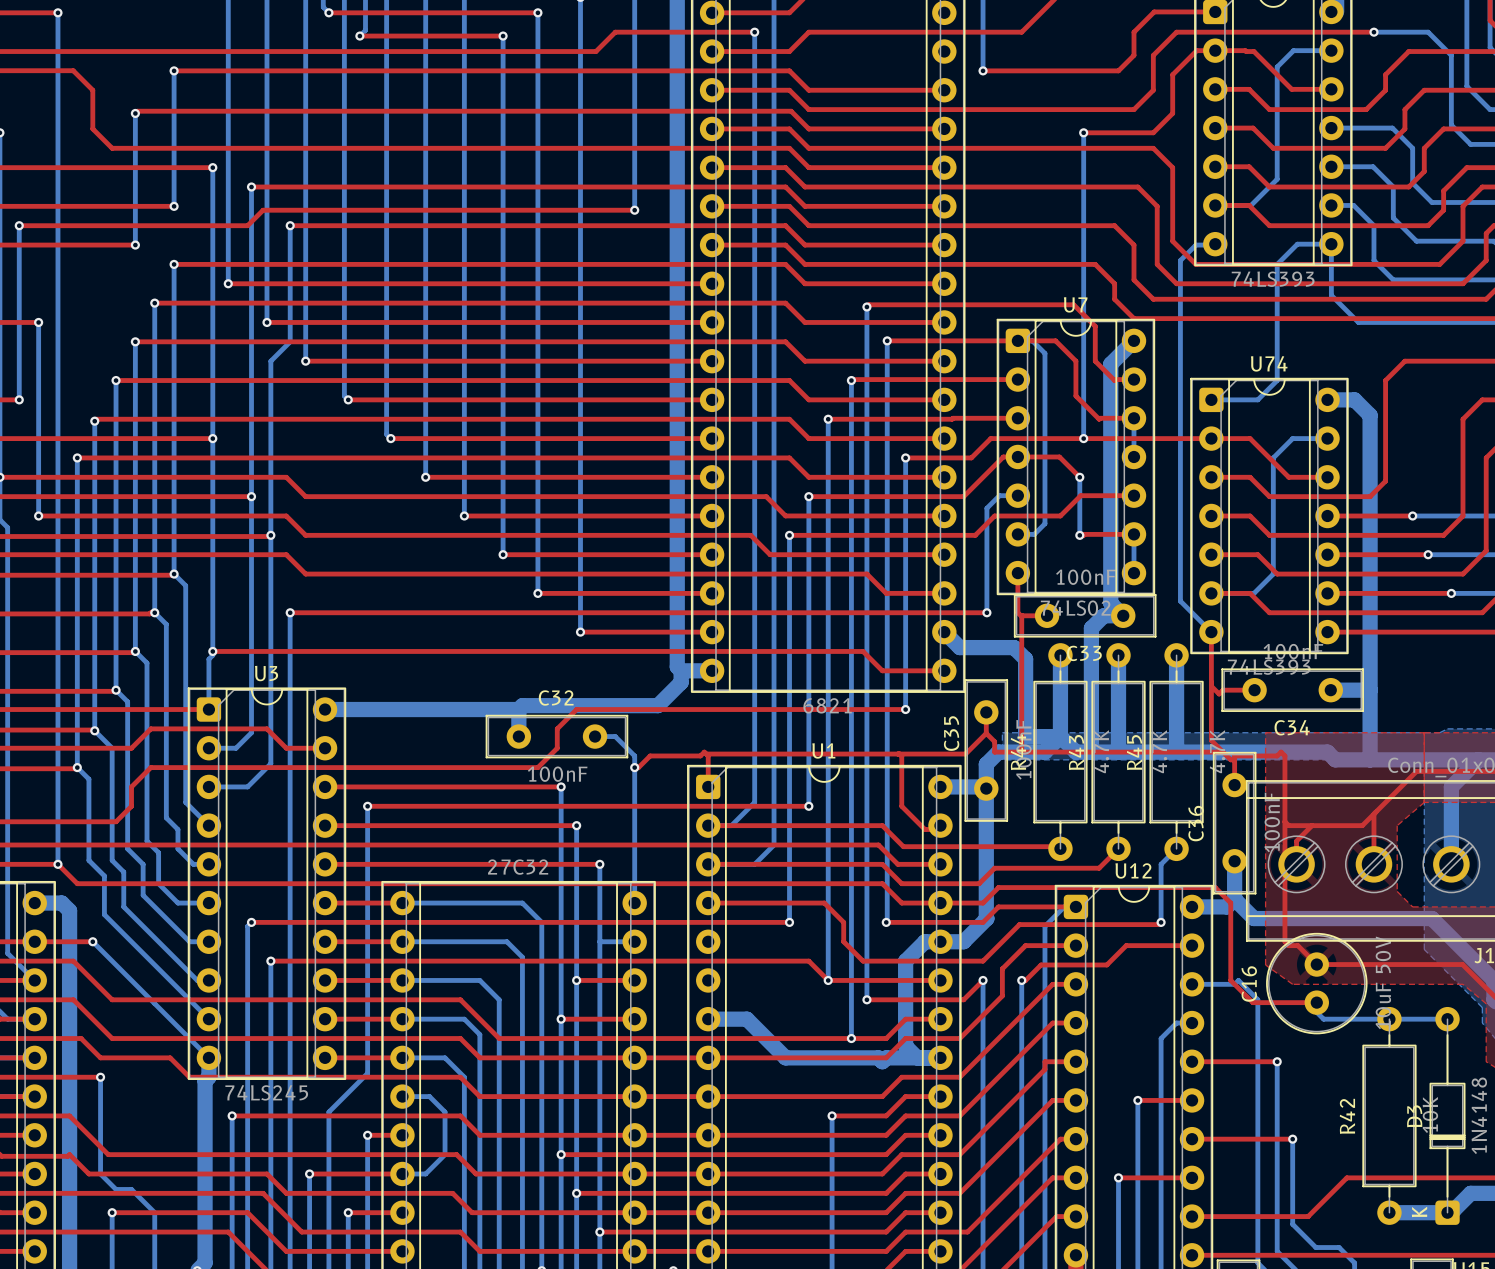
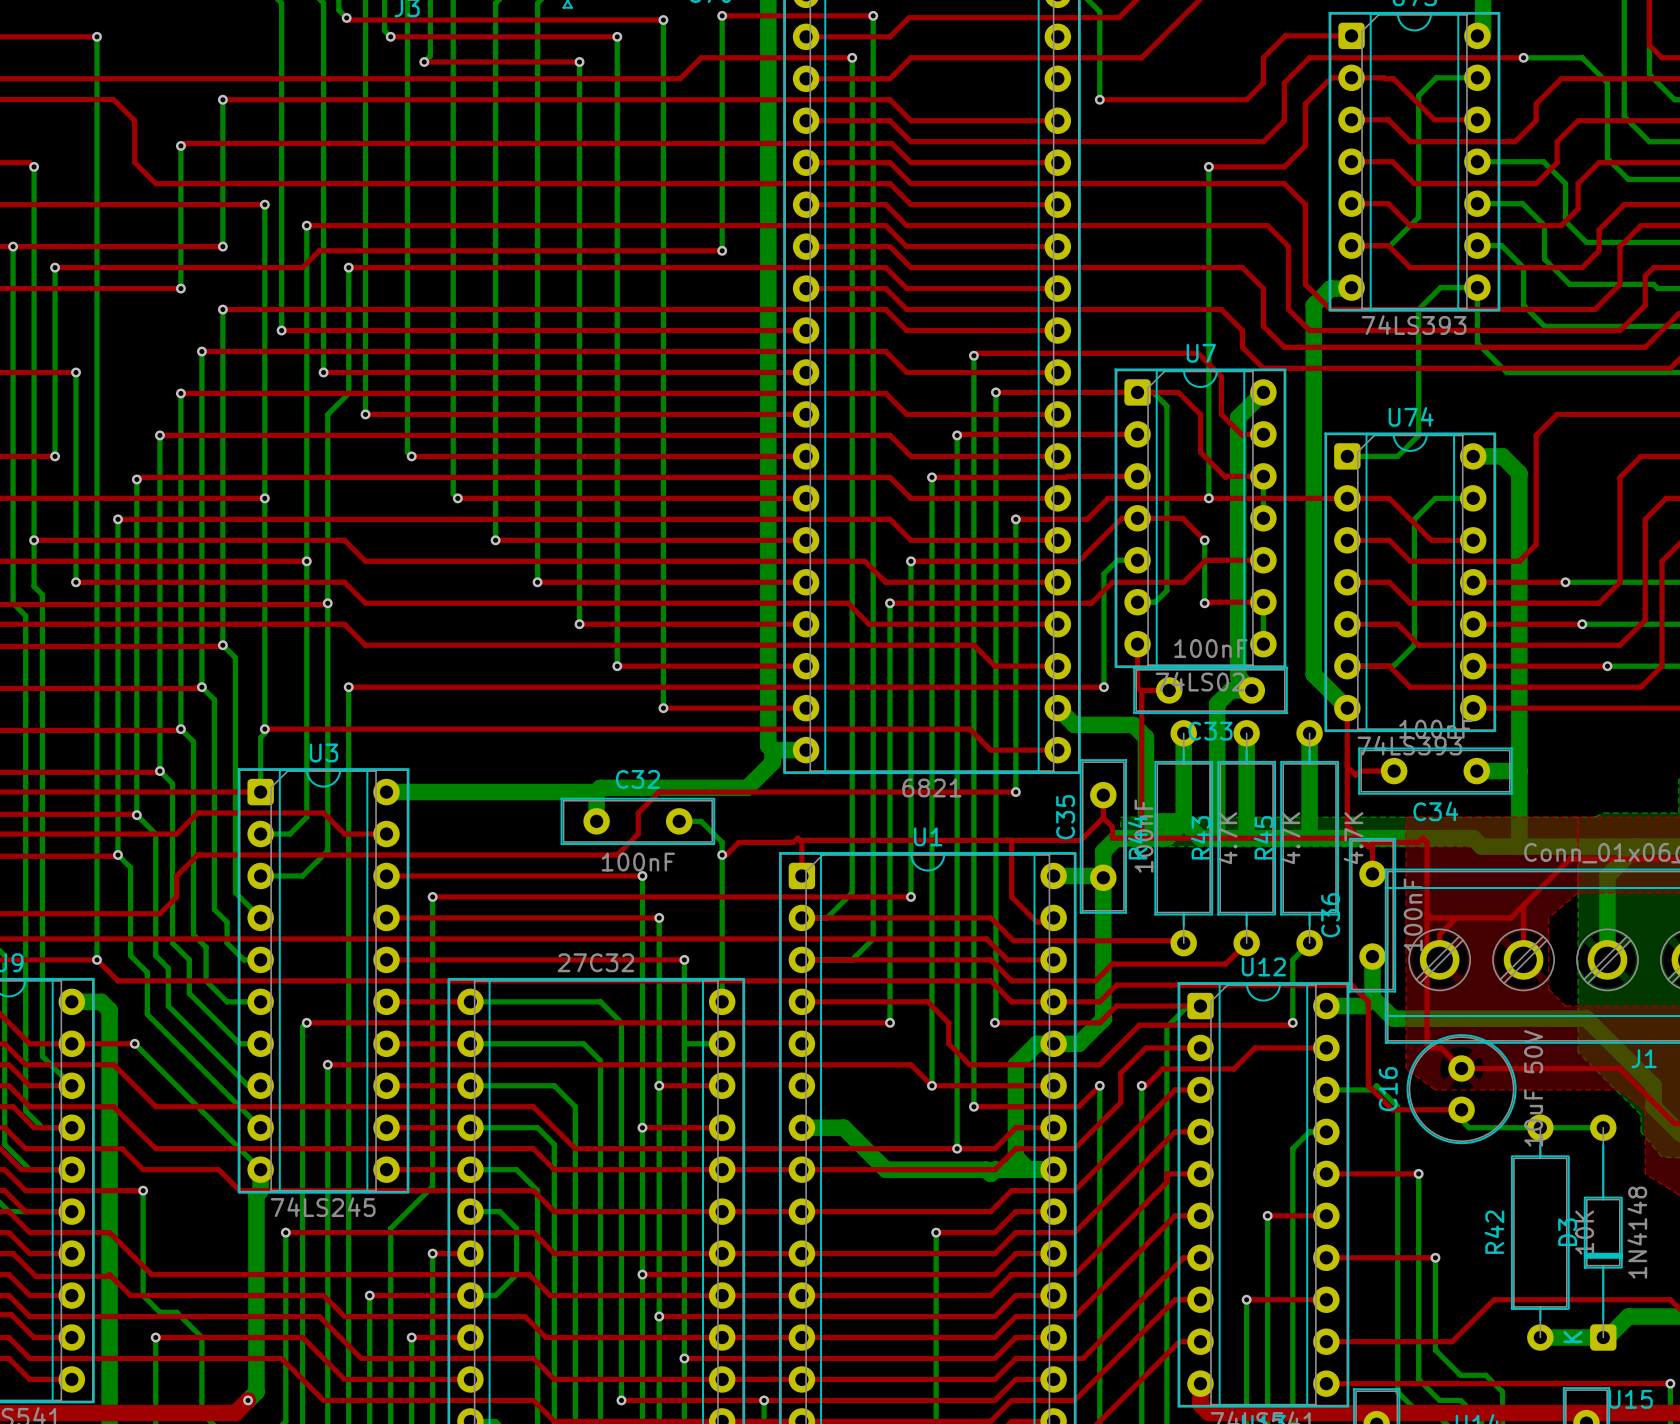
bottom track width: thin (1219, 245) (1195, 245) (1180, 260) (1180, 601) (1211, 632) -> thick (1356, 288) (1330, 288) (1313, 305) (1313, 674) (1347, 708)

